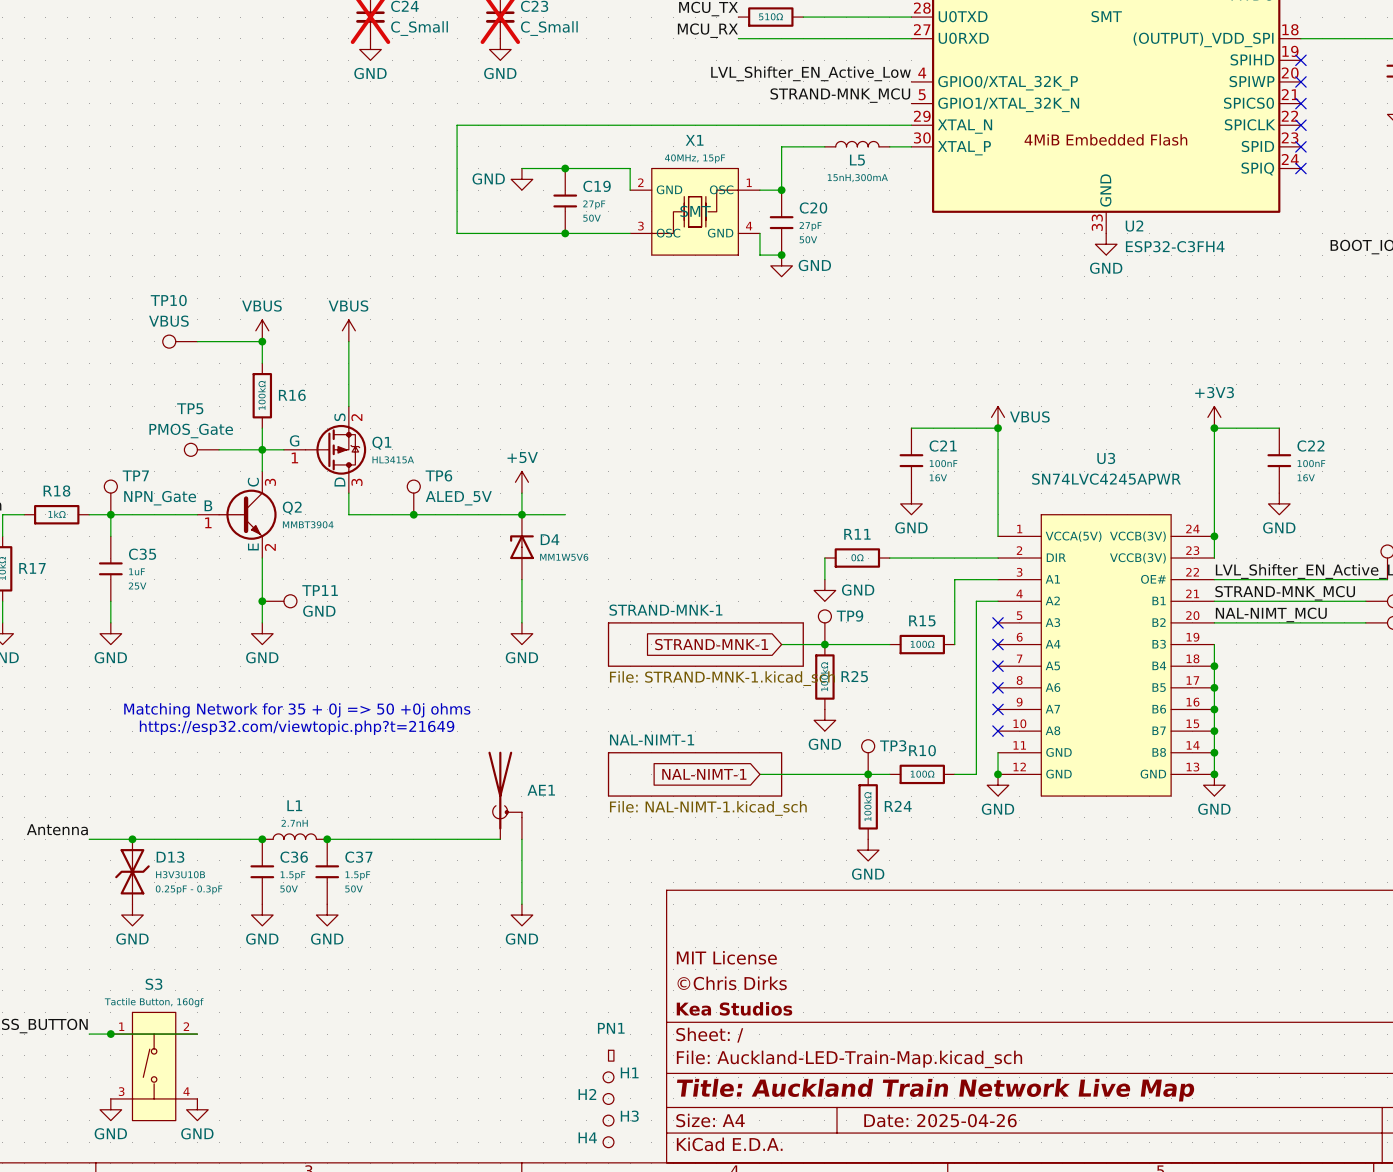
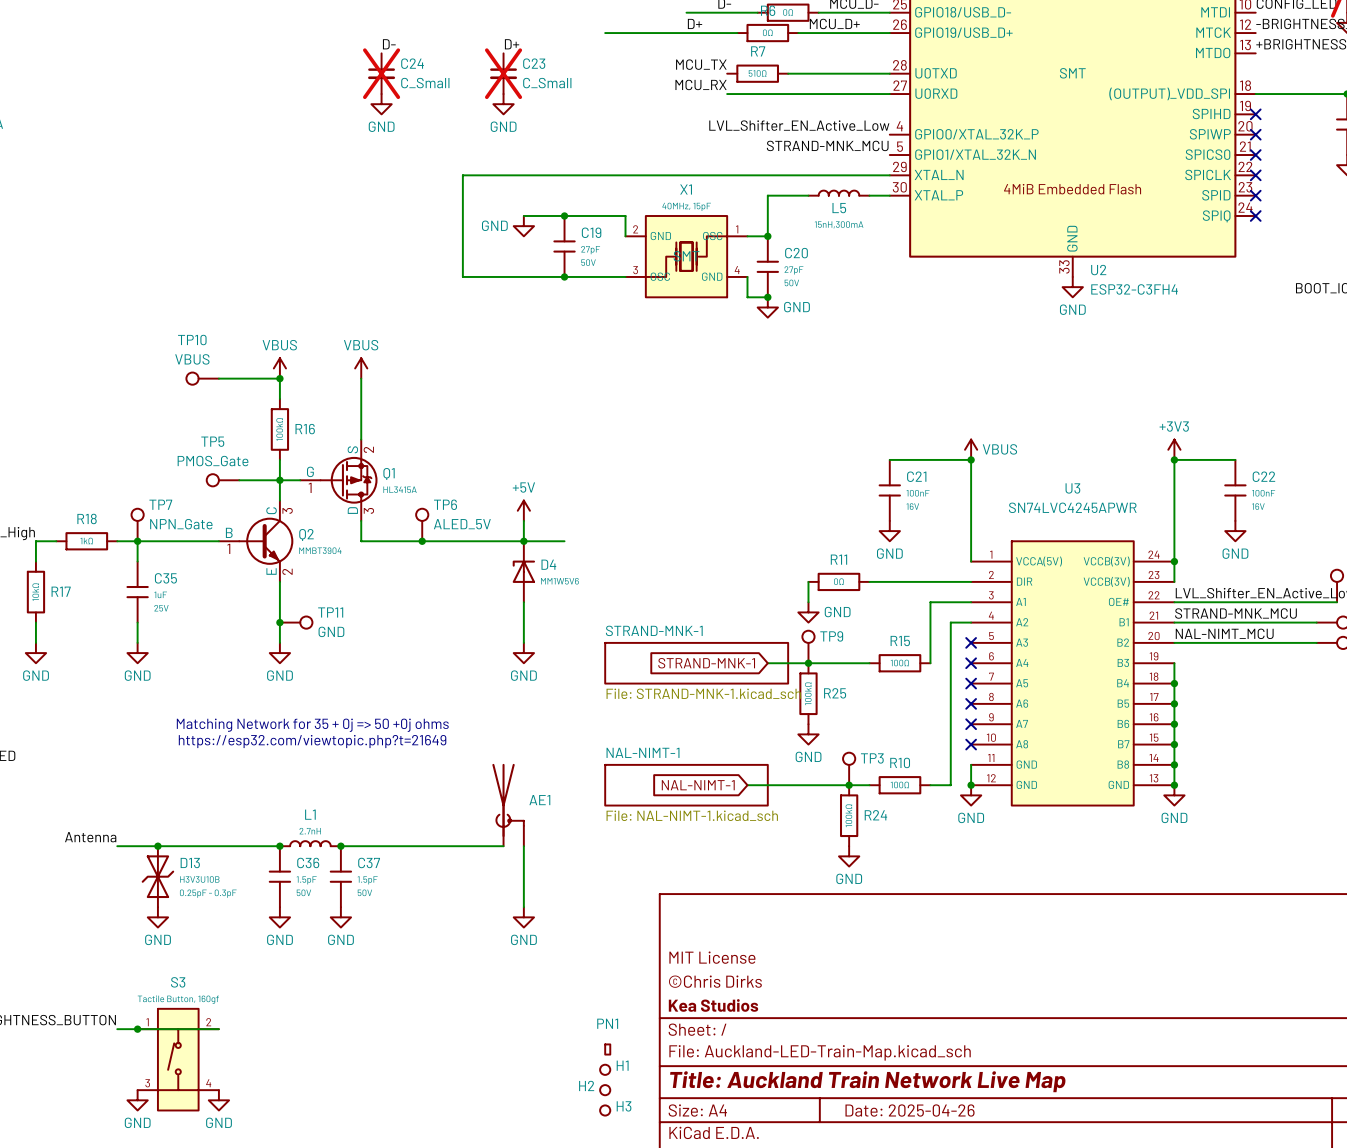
H4: (608, 1142) -> none

